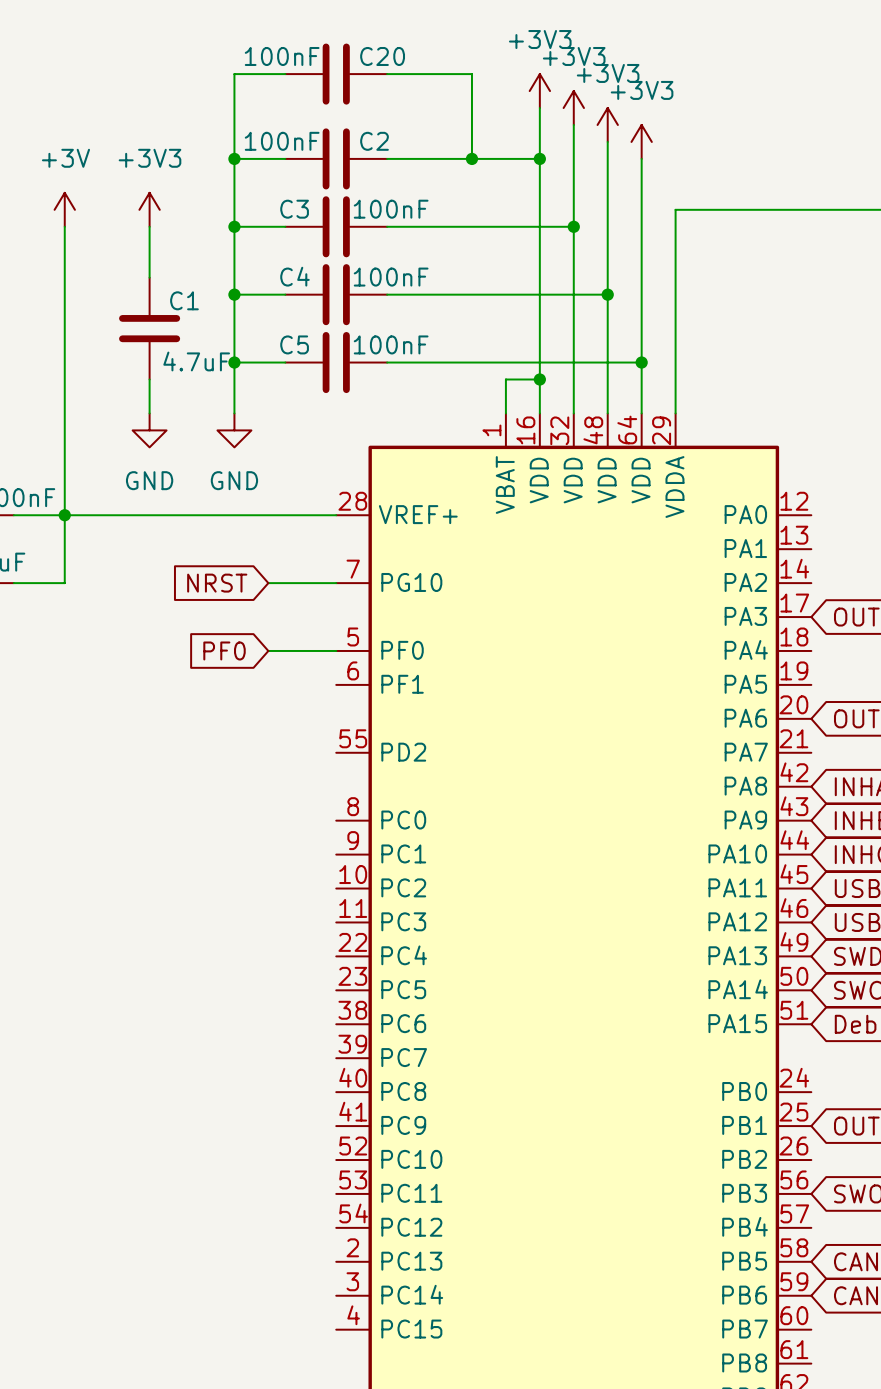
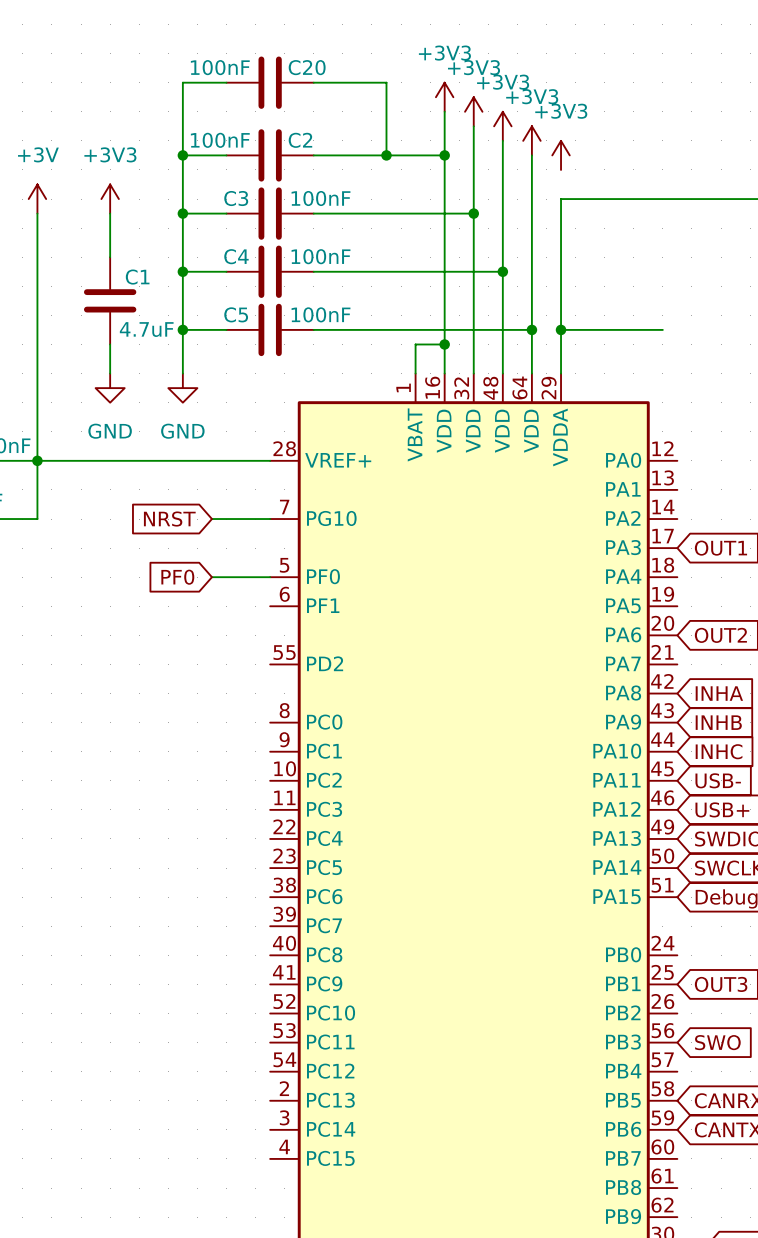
power symbol: none -> +3V3 (561, 155)
wire: none -> (561, 329) (662, 329)
junction: none -> (561, 329)

